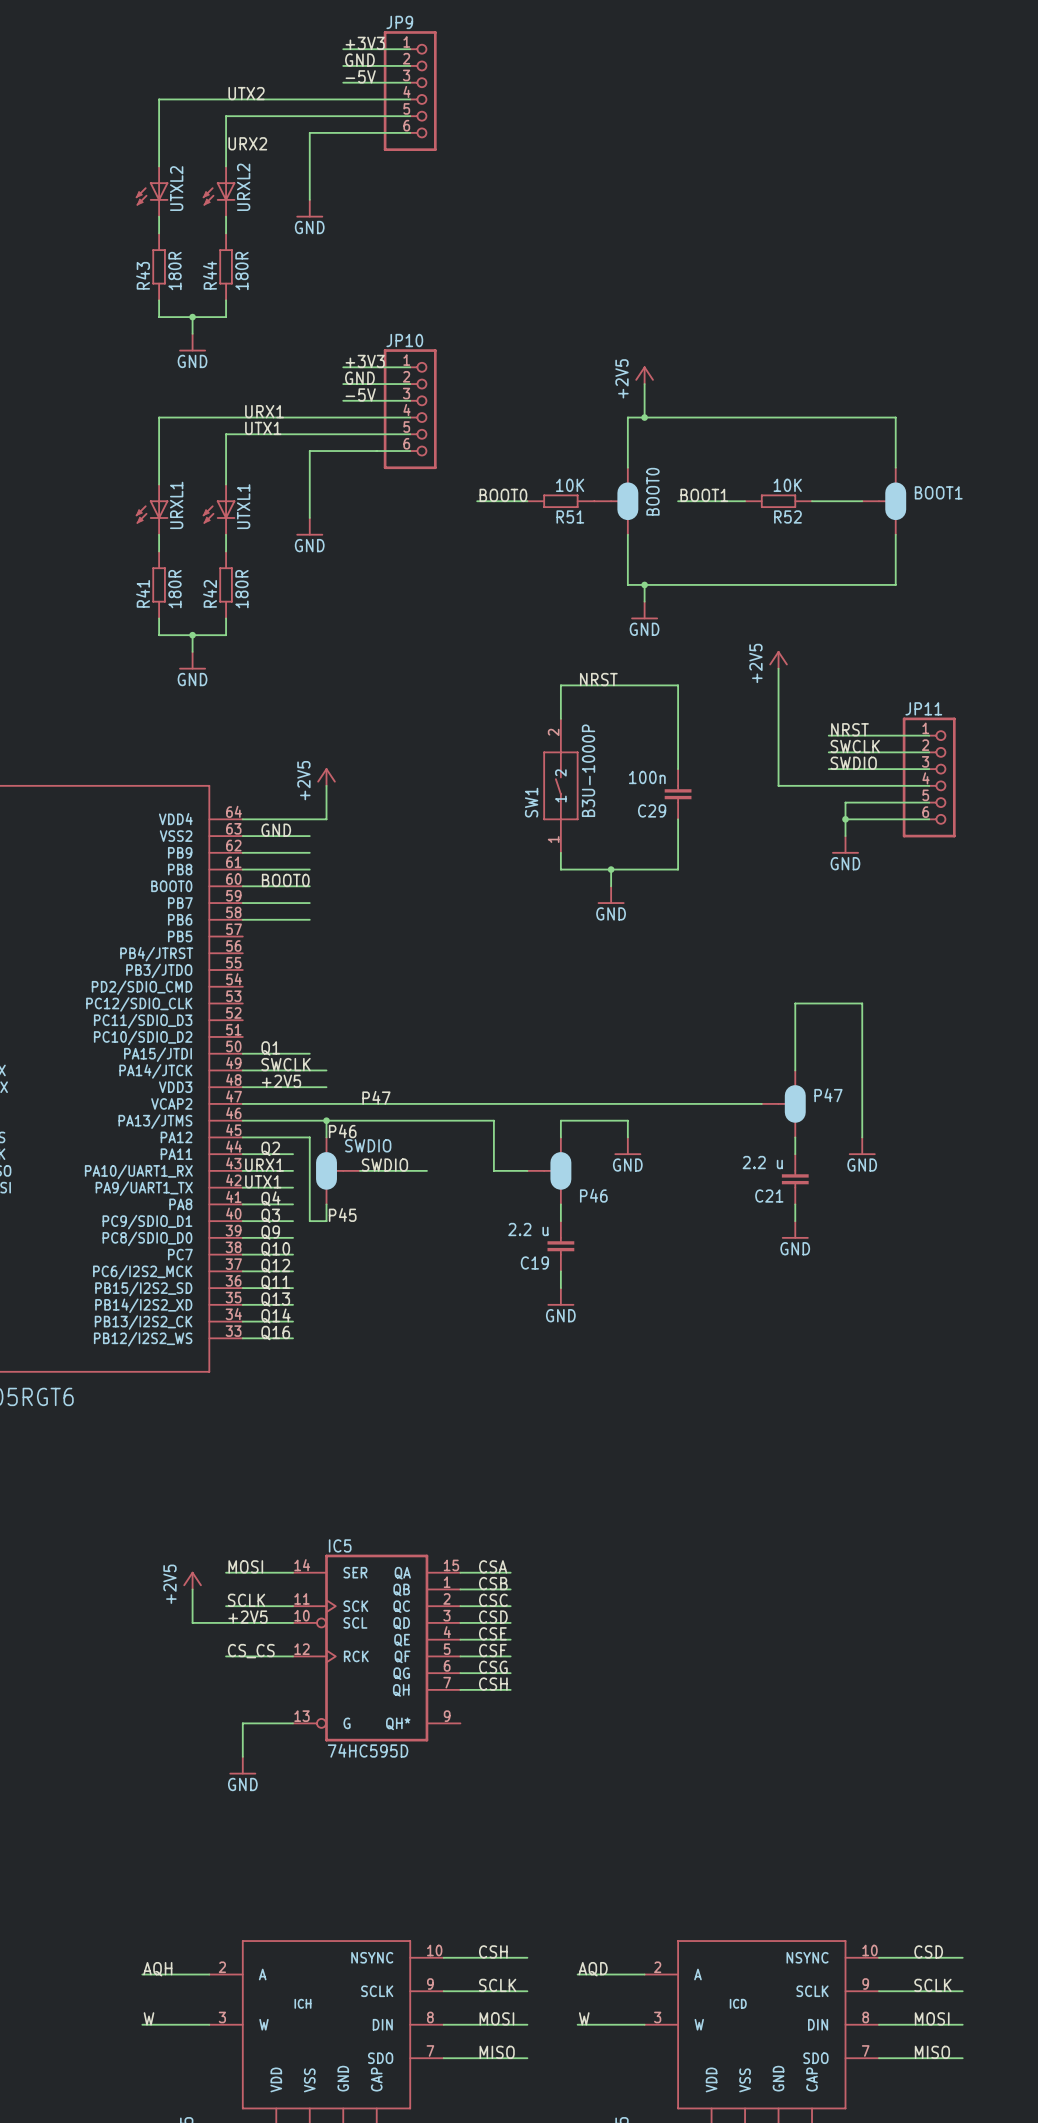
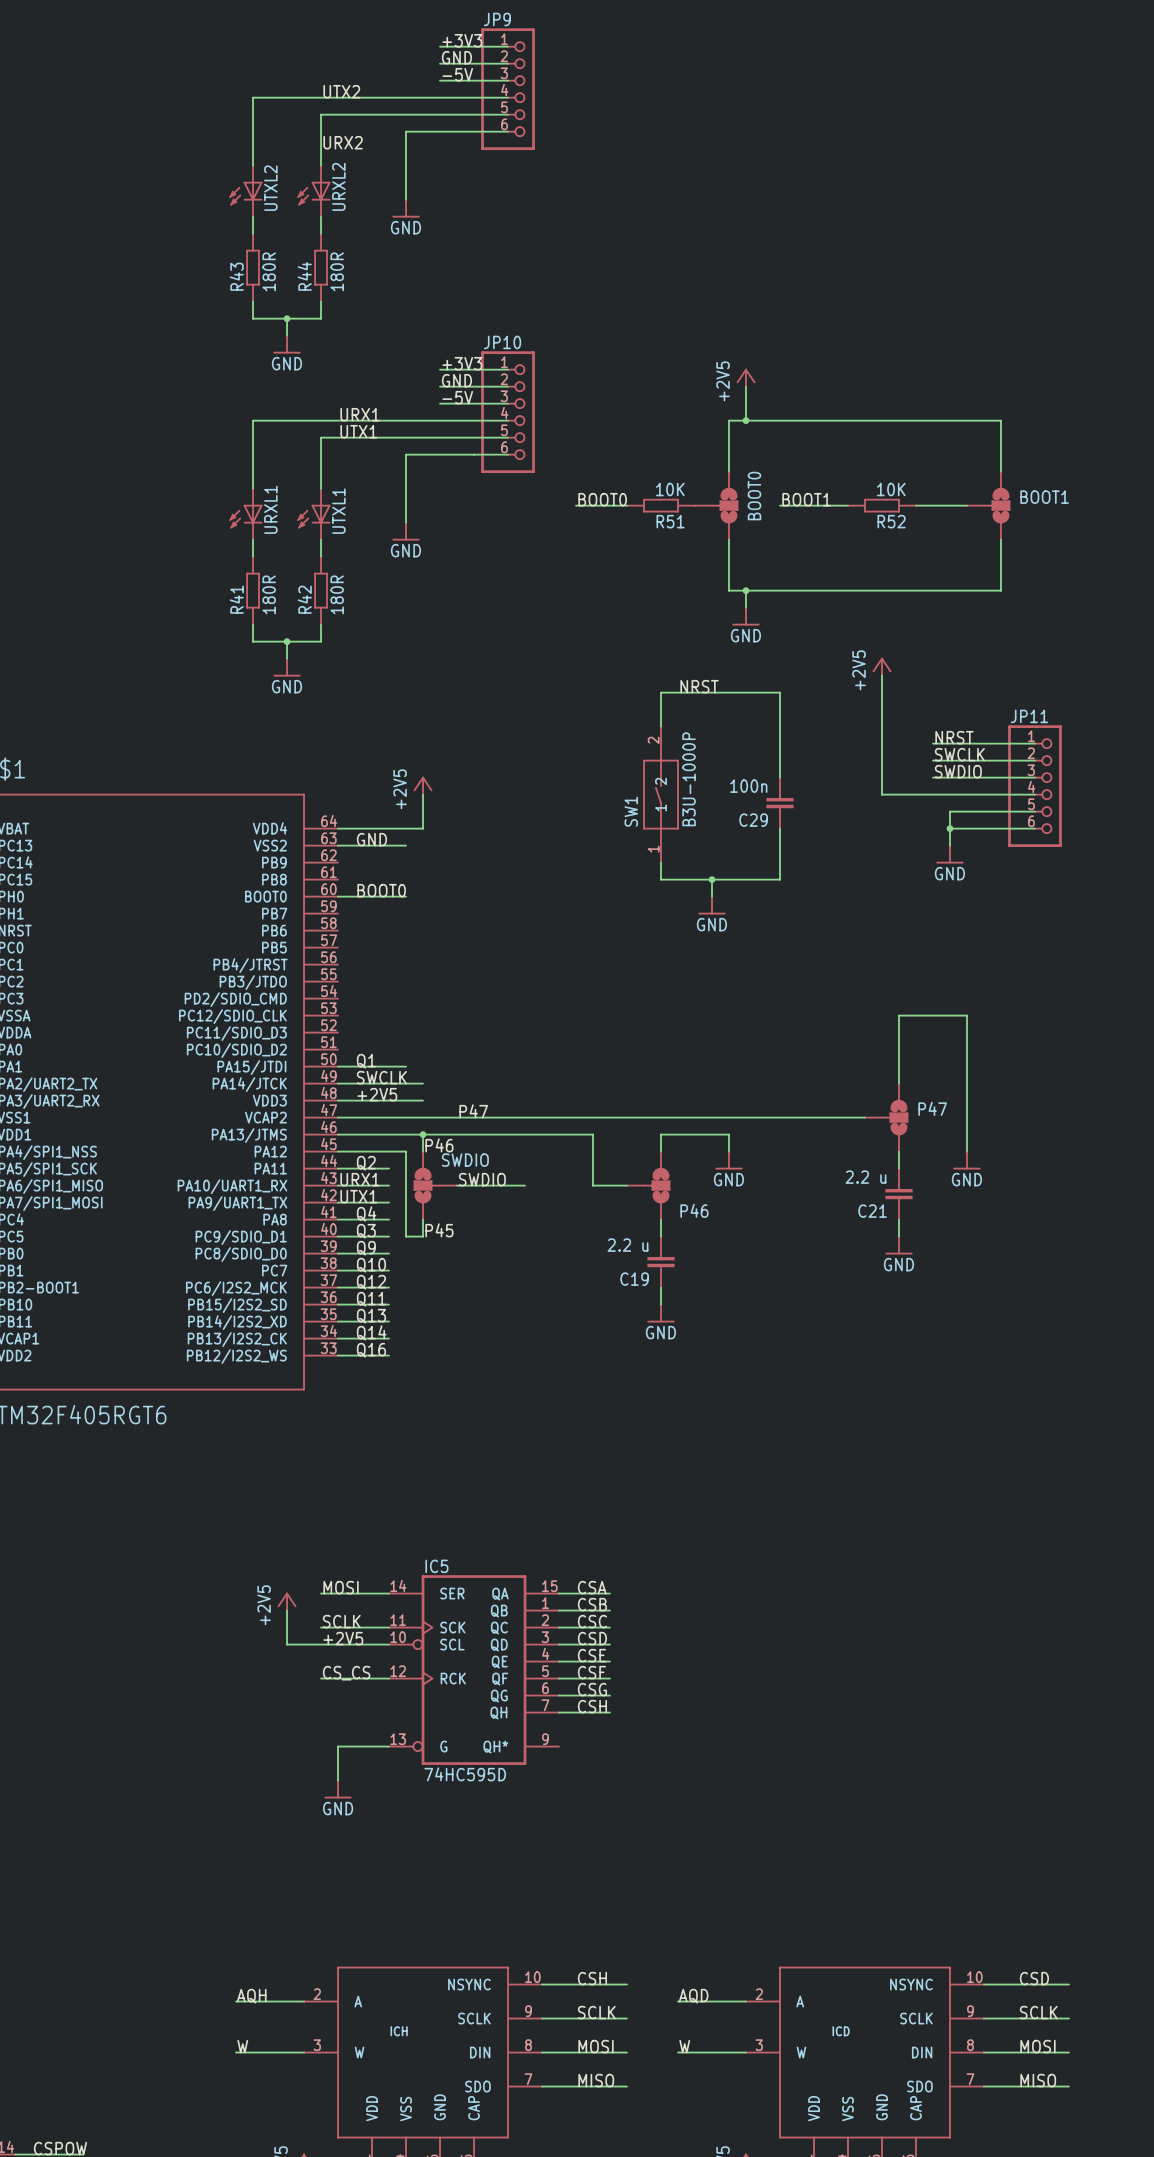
BOOT0 symbol: [594, 467, 639, 535] -> [695, 471, 739, 540]
BOOT1 symbol: [862, 467, 907, 535] -> [966, 471, 1010, 540]
wire: (242, 852) (309, 852) -> none
wire: (242, 869) (309, 869) -> none
wire: (242, 903) (309, 903) -> none
wire: (242, 919) (309, 919) -> none
P47 symbol: [761, 1070, 806, 1138] -> [864, 1083, 908, 1152]
SWDIO symbol: [316, 1137, 360, 1205] -> [414, 1151, 458, 1220]
P46 symbol: [527, 1137, 572, 1205] -> [627, 1151, 671, 1220]

